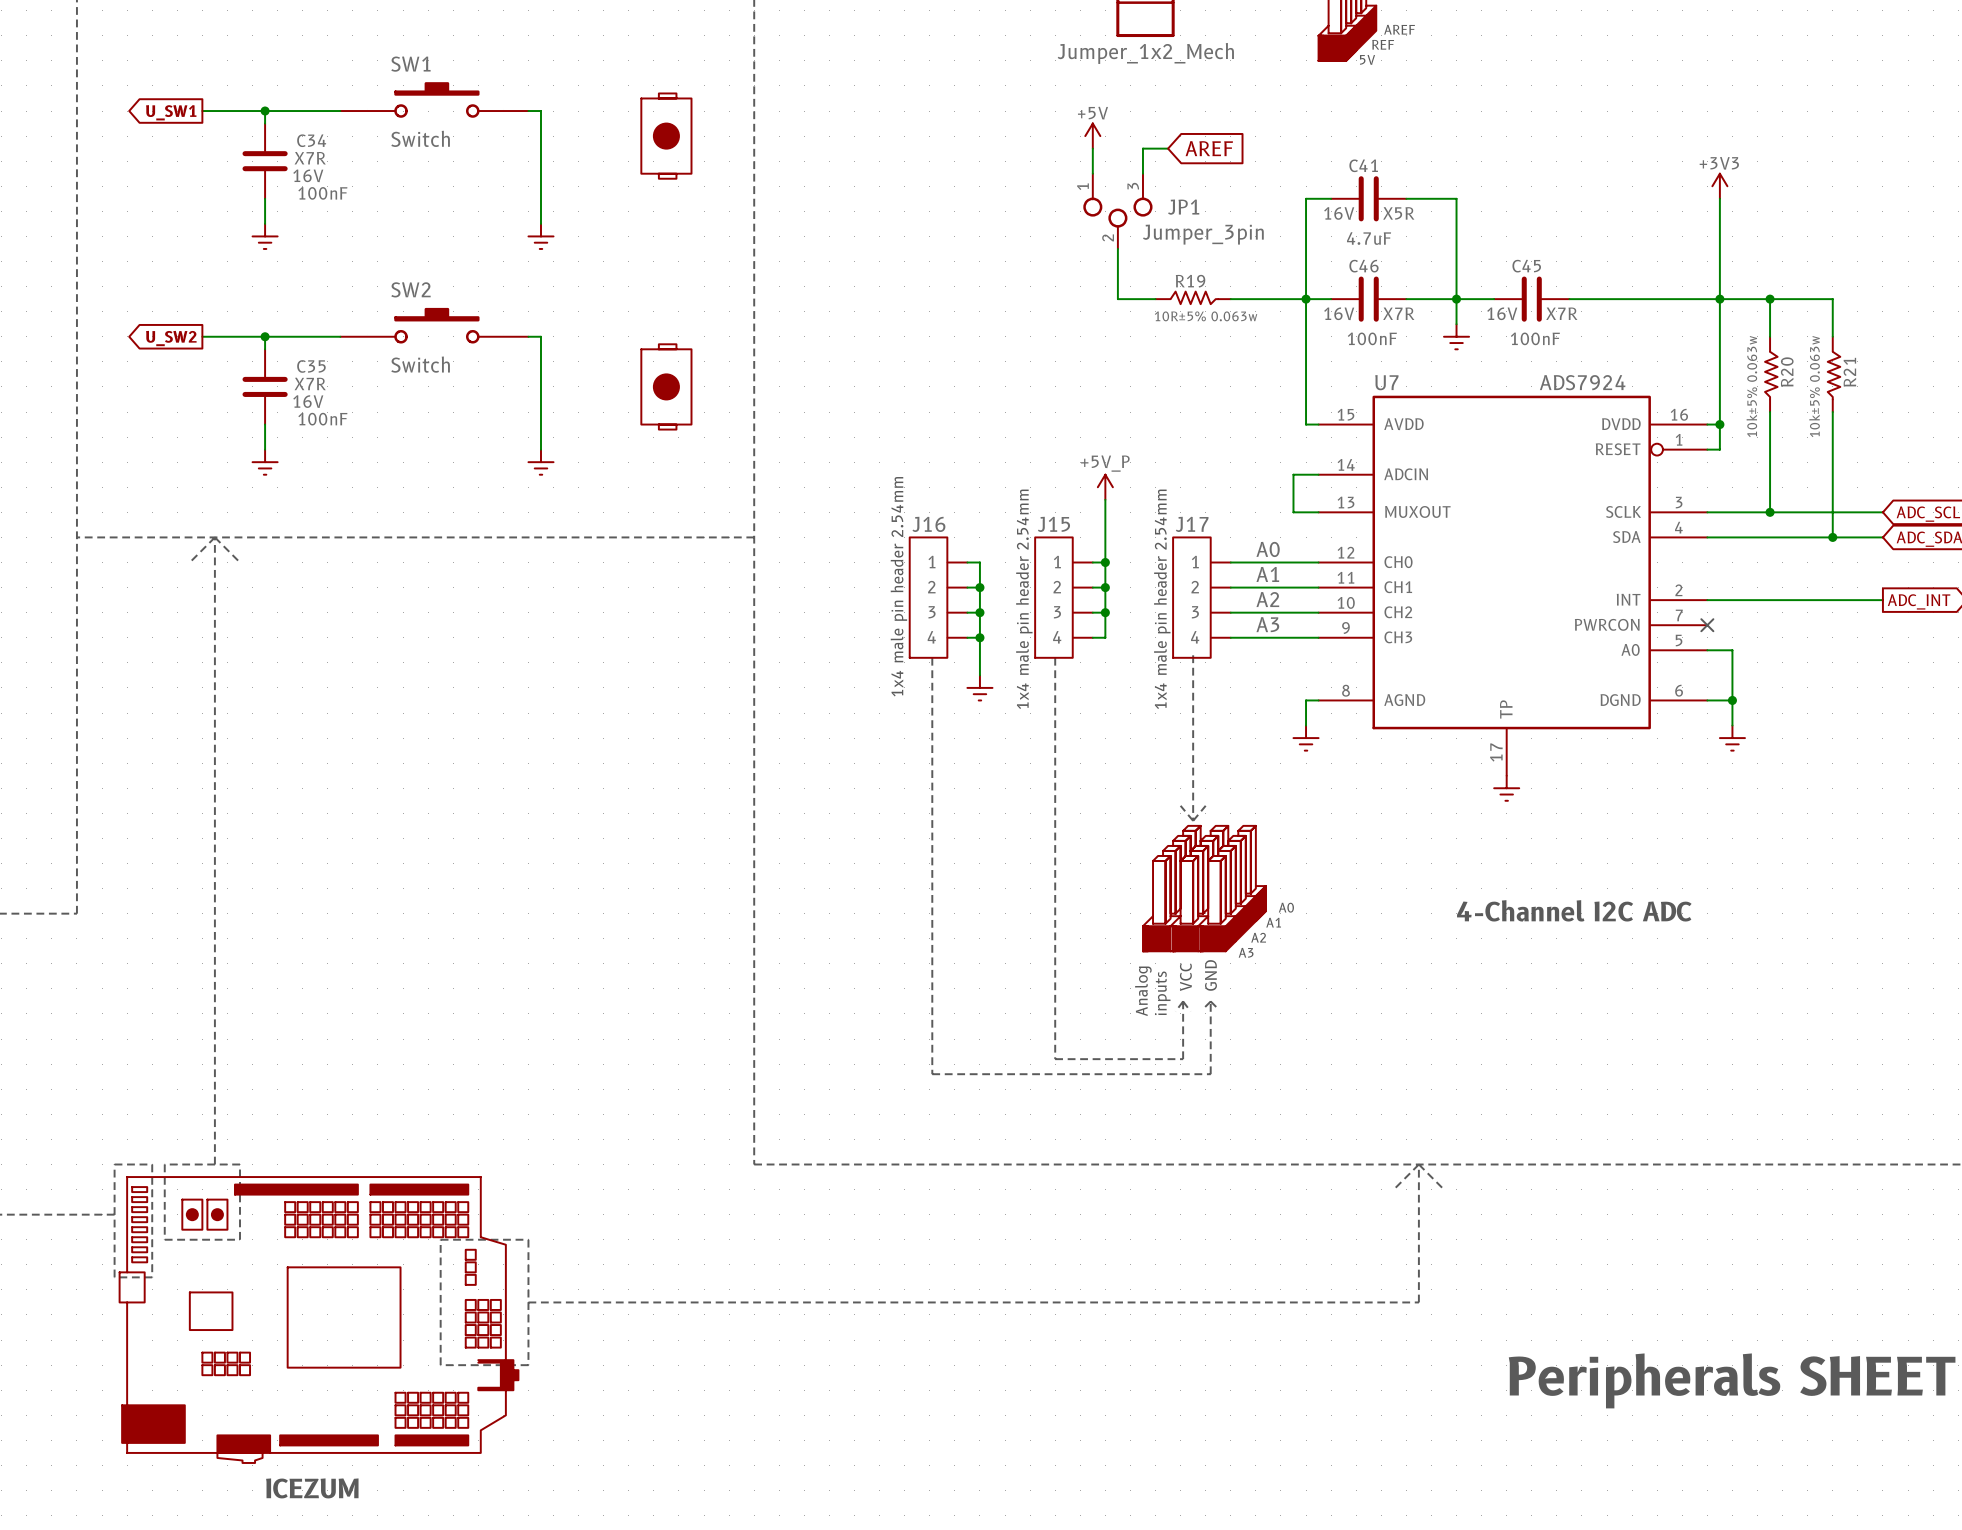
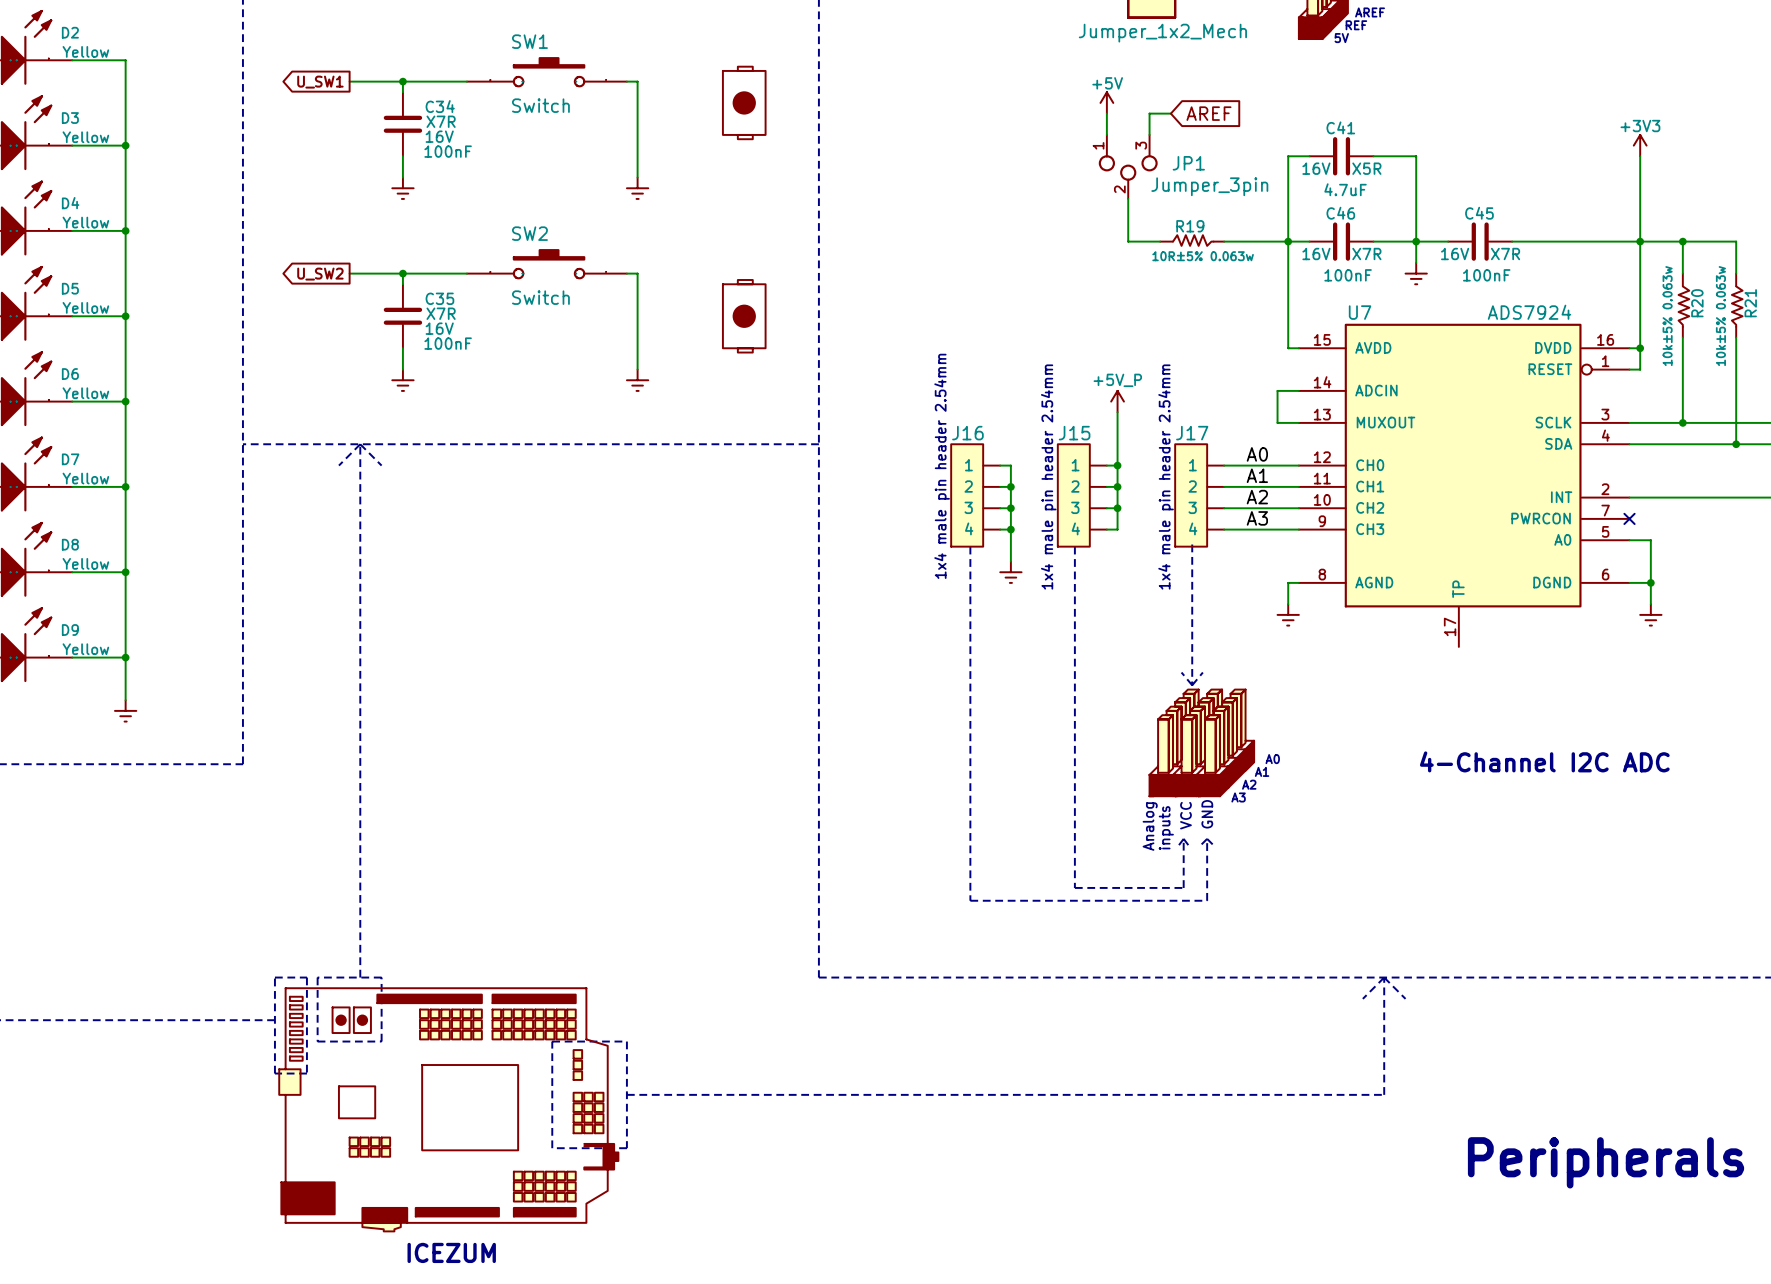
power symbol: (1506, 788) -> none

